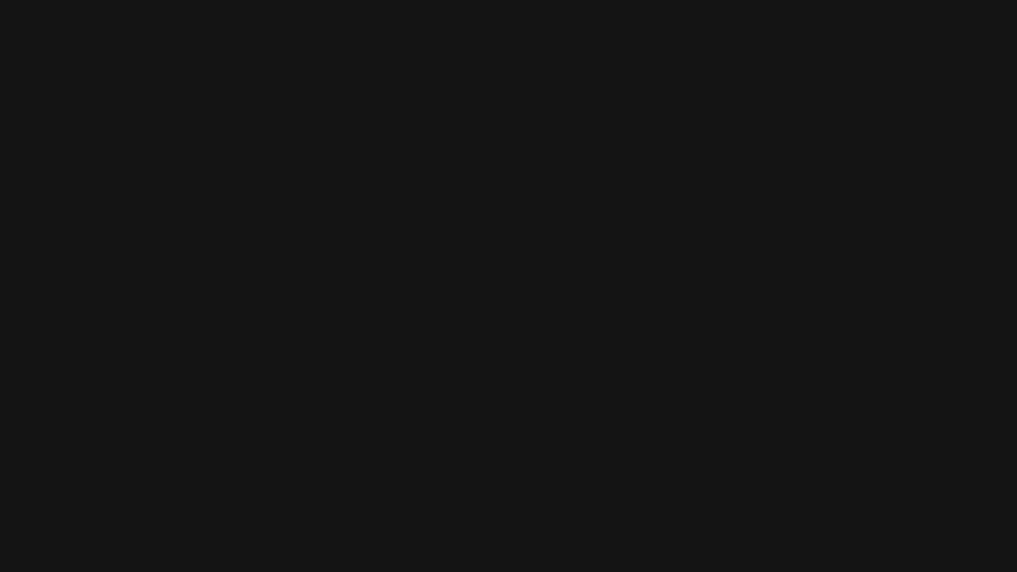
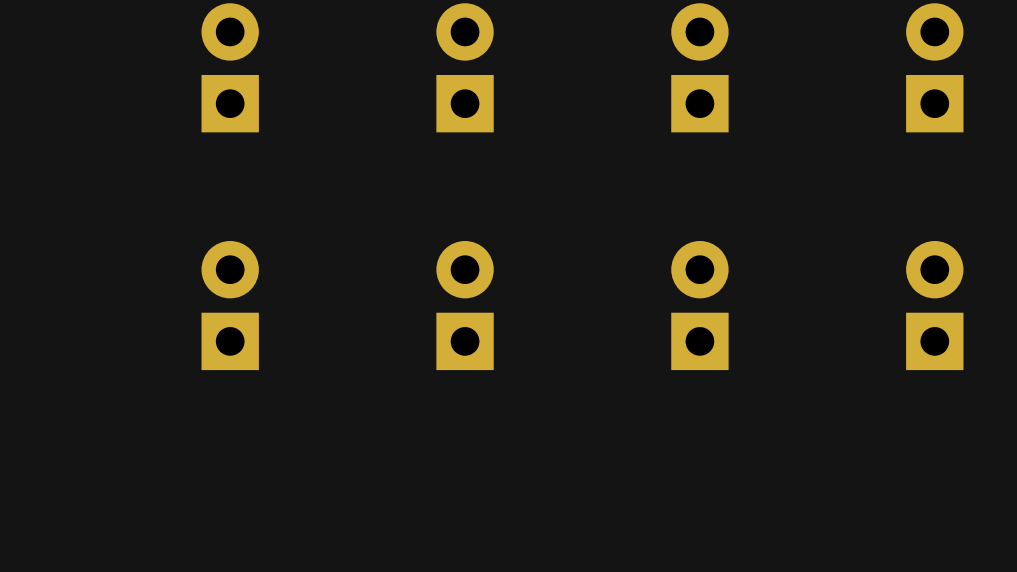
part: none -> (230, 67)
part: none -> (465, 67)
part: none -> (699, 67)
part: none -> (934, 67)
part: none -> (230, 305)
part: none -> (465, 305)
part: none -> (699, 305)
part: none -> (934, 305)

